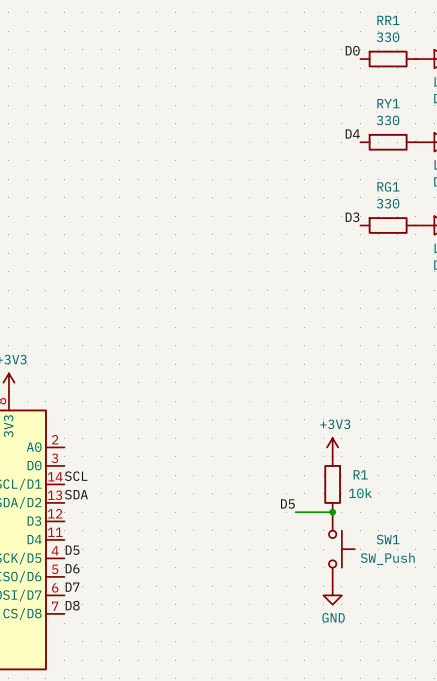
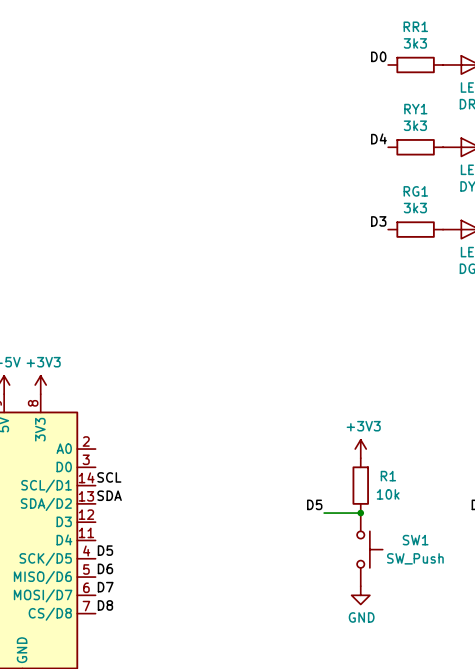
RR1 value: 330 (388, 37) -> 3k3 (415, 43)
RY1 value: 330 (388, 120) -> 3k3 (415, 125)
RG1 value: 330 (388, 203) -> 3k3 (415, 208)

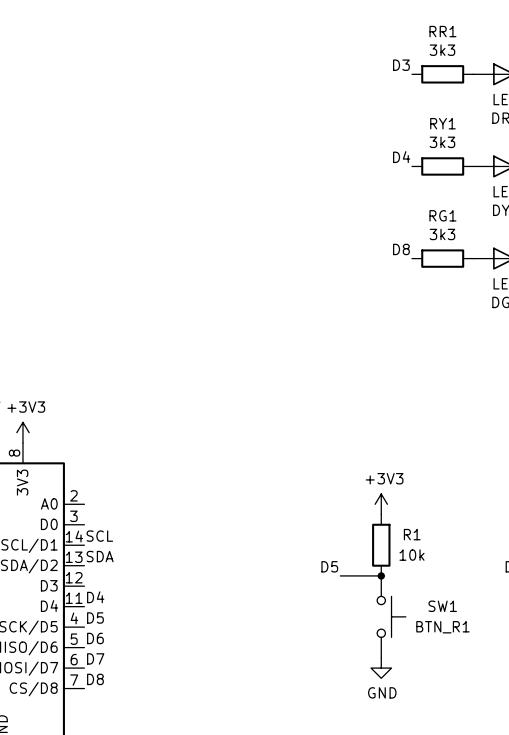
label: D0 (378, 56) -> D3 (401, 65)
label: D3 (378, 221) -> D8 (401, 249)
label: none -> D4 (95, 597)
SW1 value: SW_Push (415, 558) -> BTN_R1 (442, 627)

